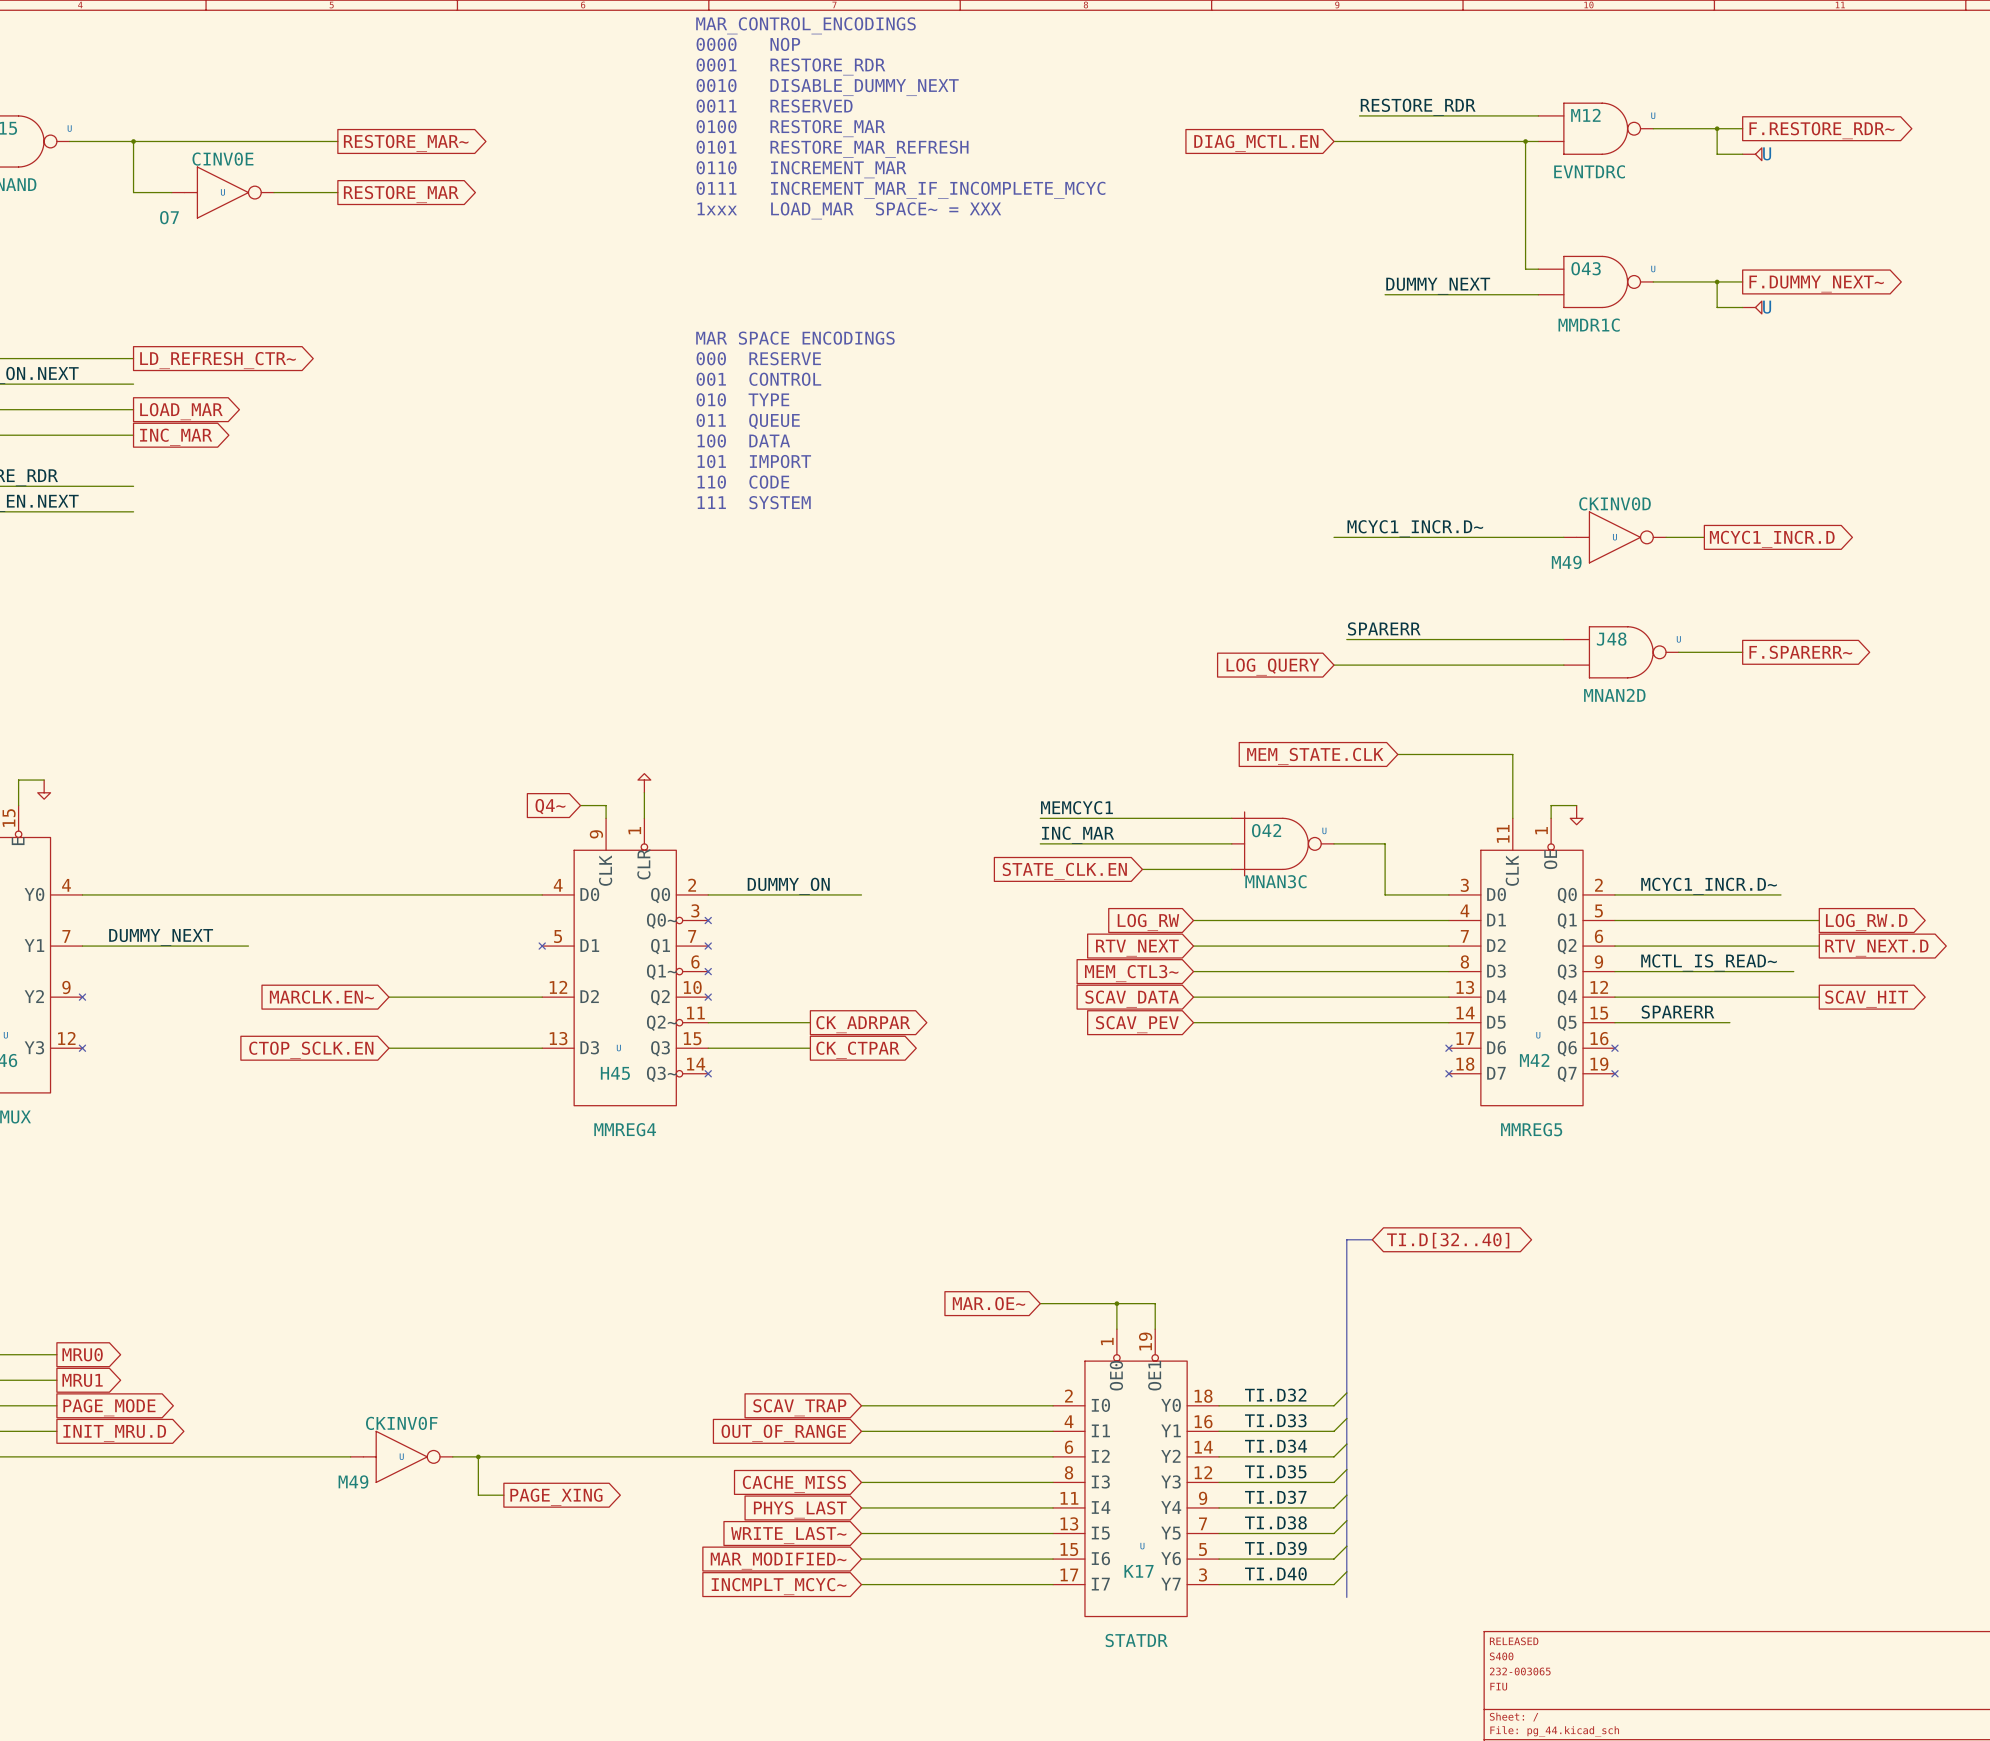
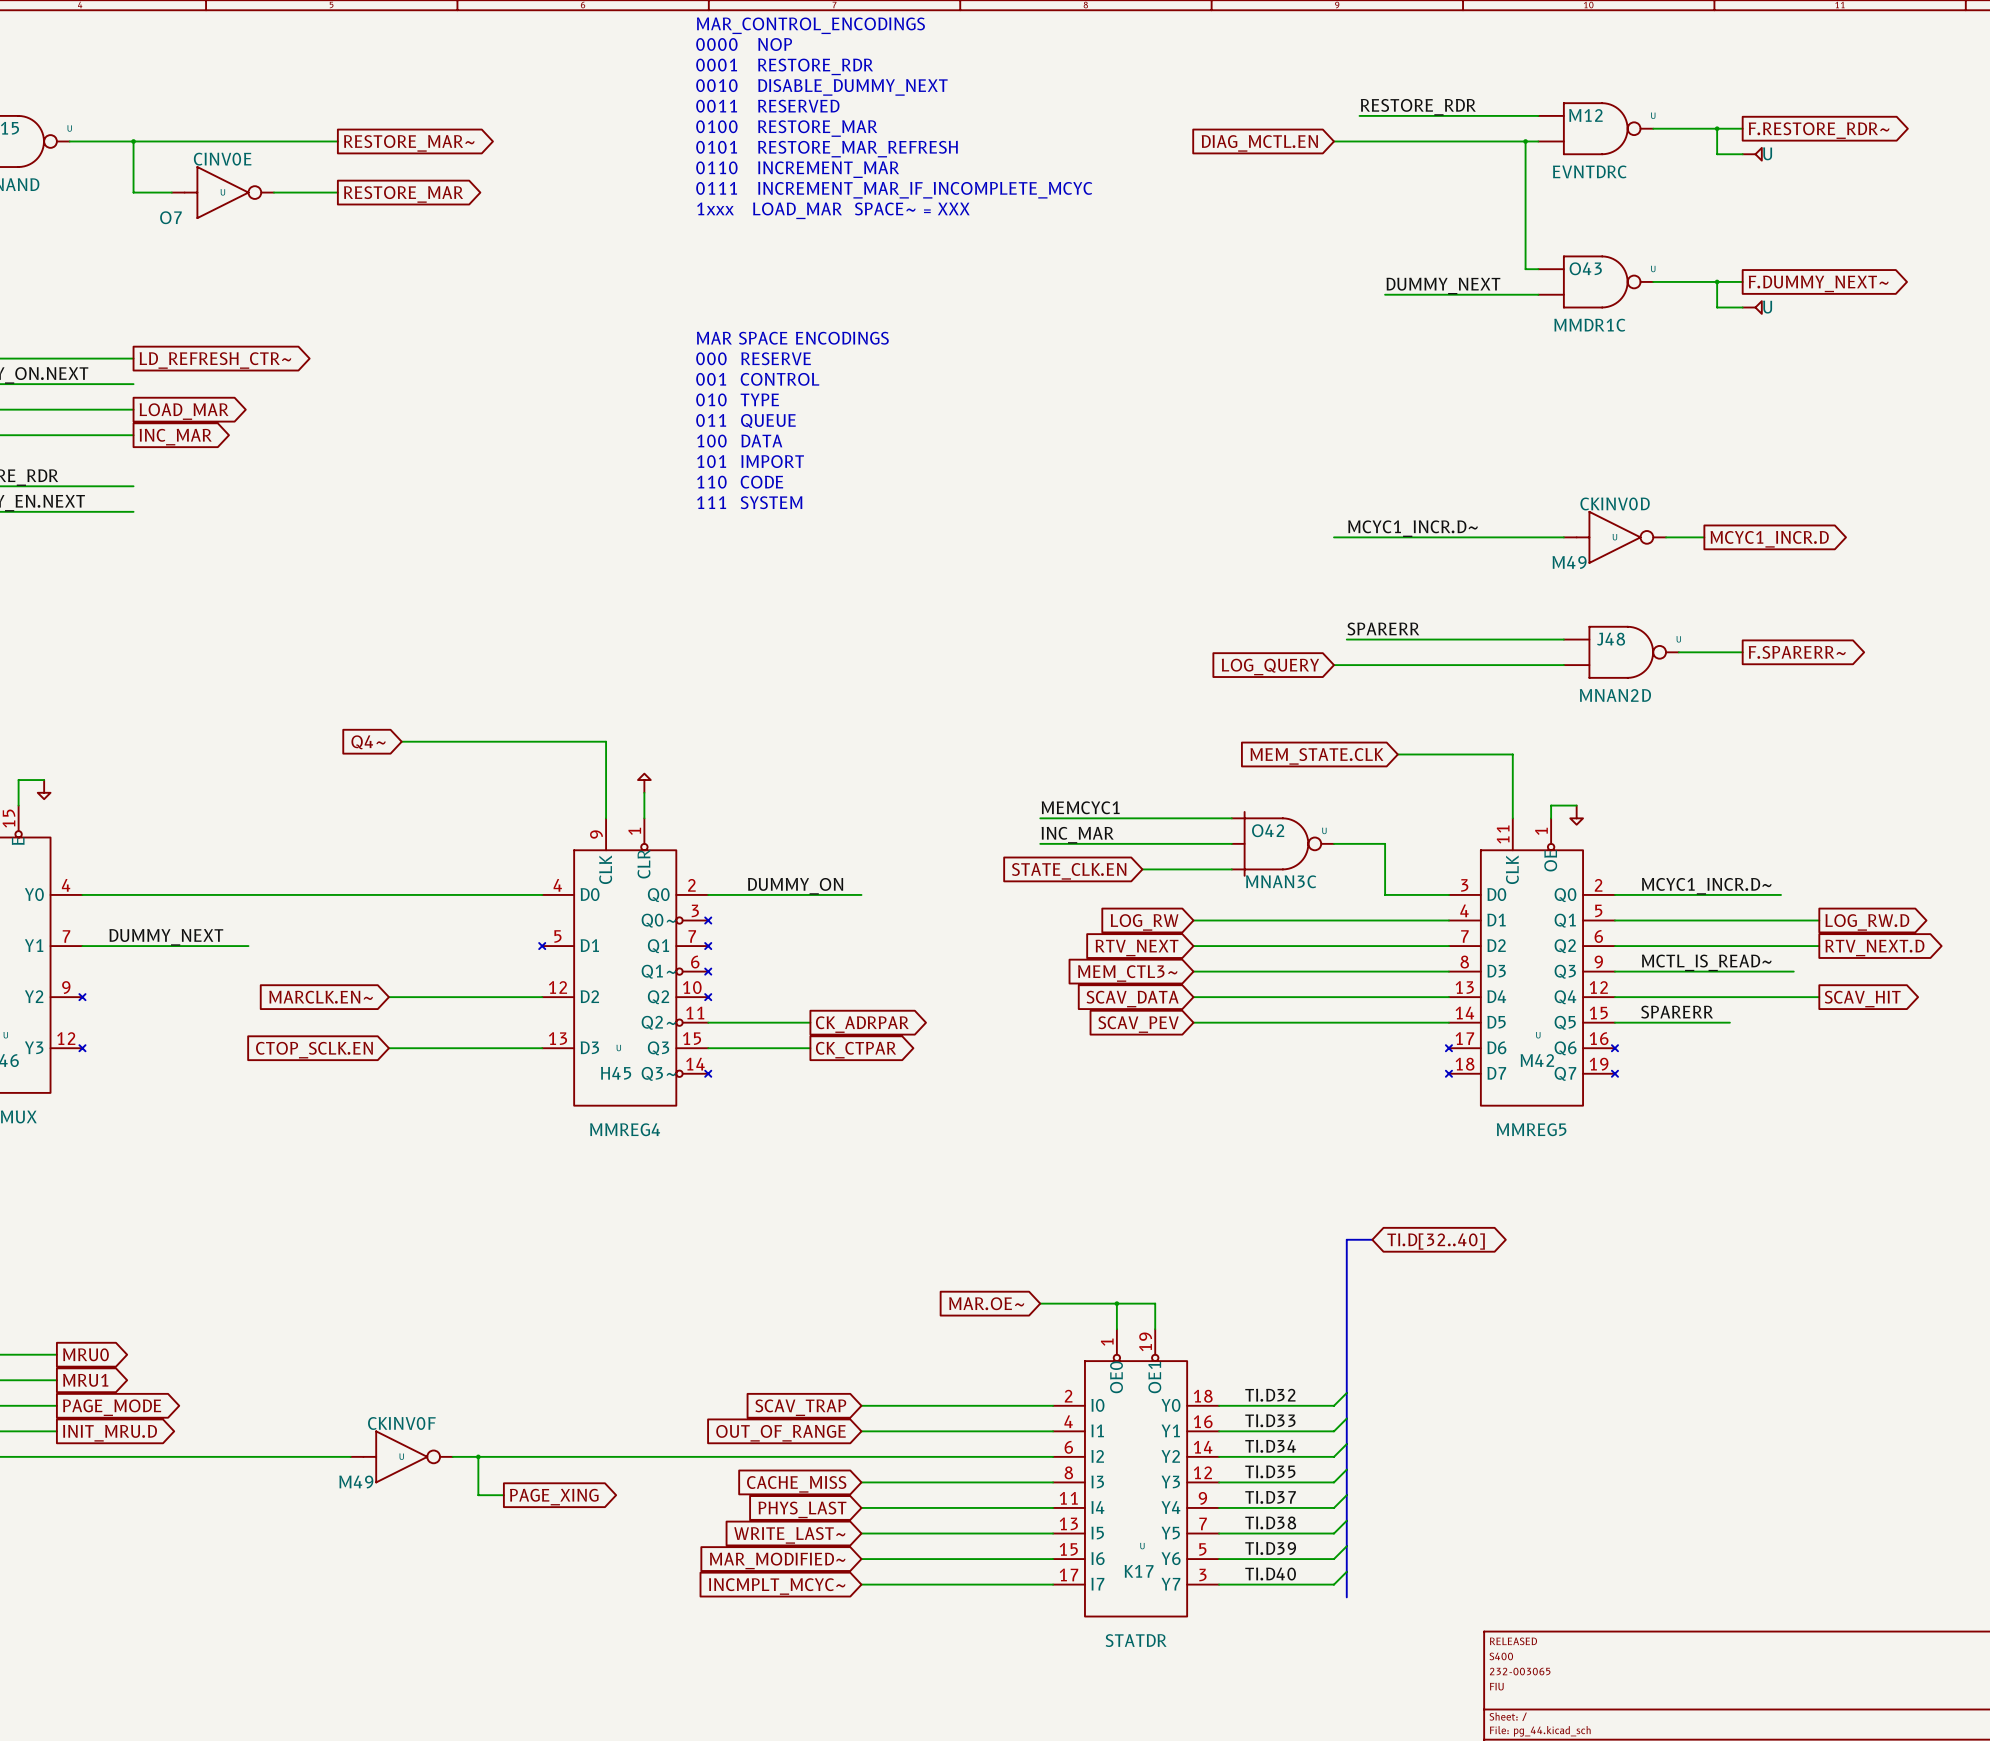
global label: none -> Q4~ (368, 742)
wire: (580, 805) (606, 805) -> (401, 741) (606, 741) (606, 805)
global label: Q4~ (550, 806) -> none

